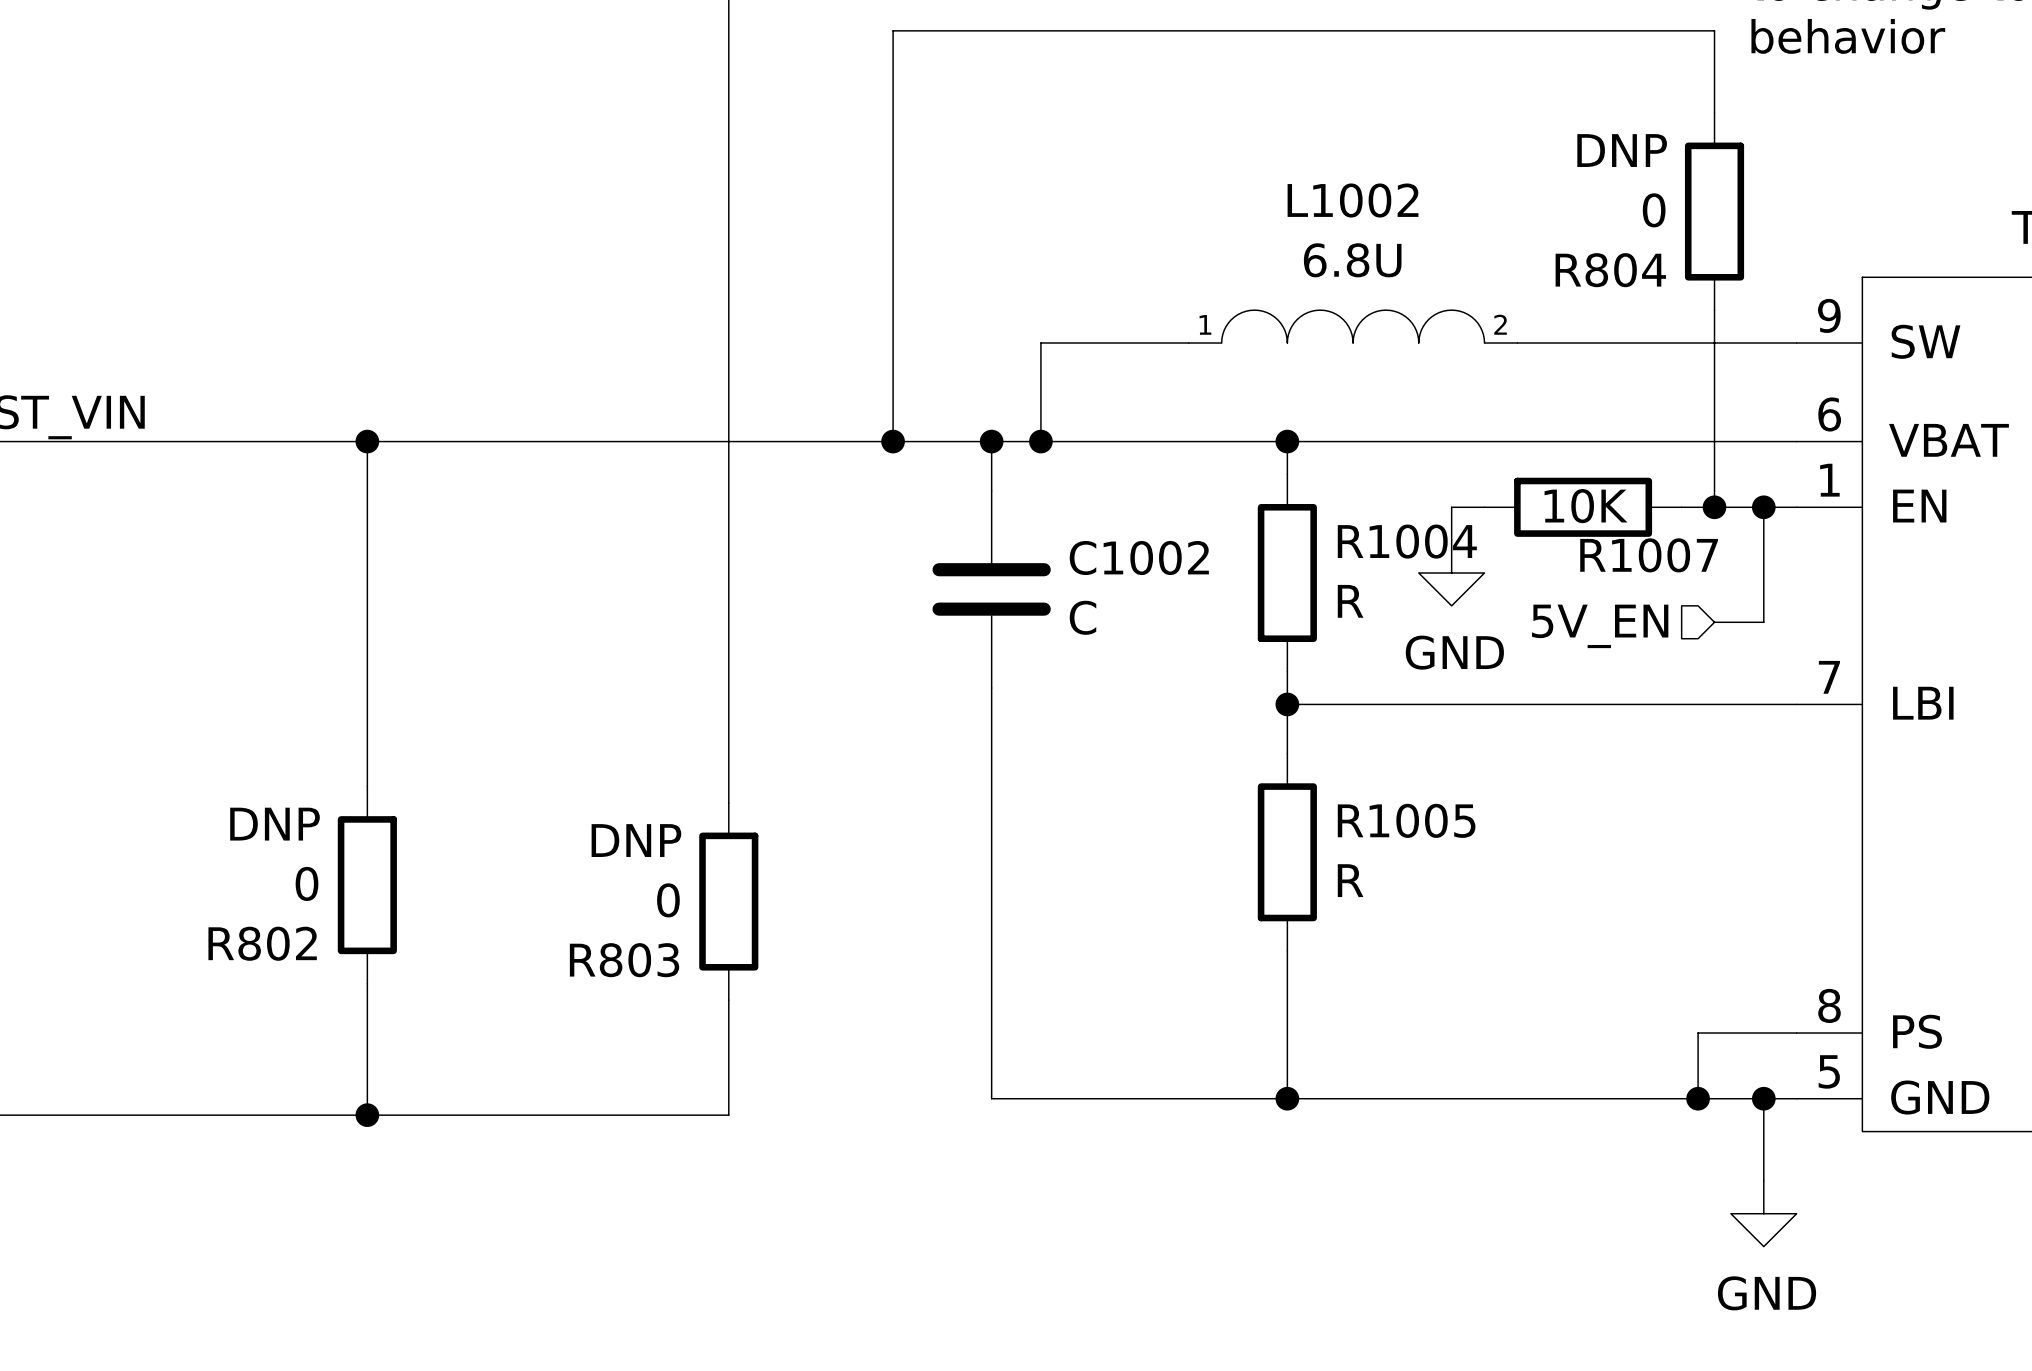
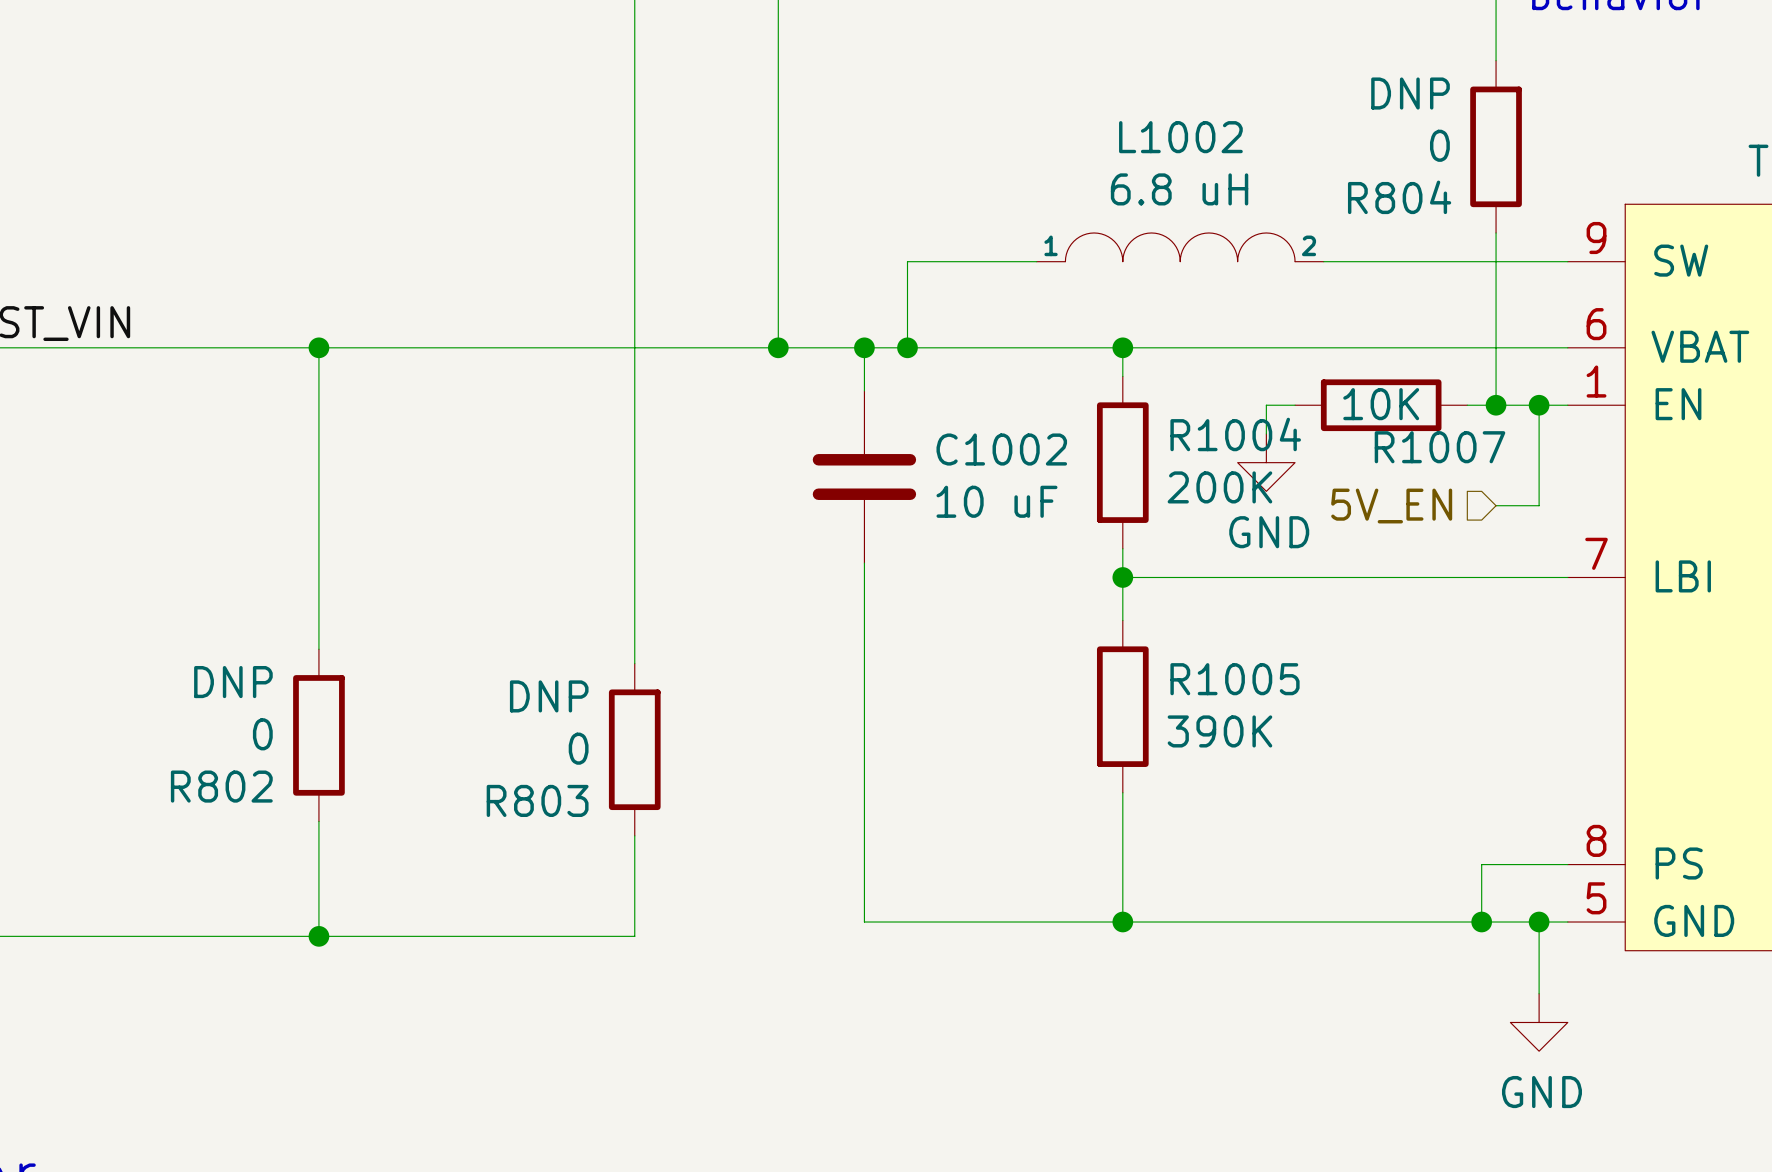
L1002 value: 6.8U (1352, 260) -> 6.8 uH (1179, 189)
R1004 value: R (1350, 601) -> 200K (1219, 487)
C1002 value: C (1083, 617) -> 10 uF (996, 501)
R1005 value: R (1350, 880) -> 390K (1219, 731)

